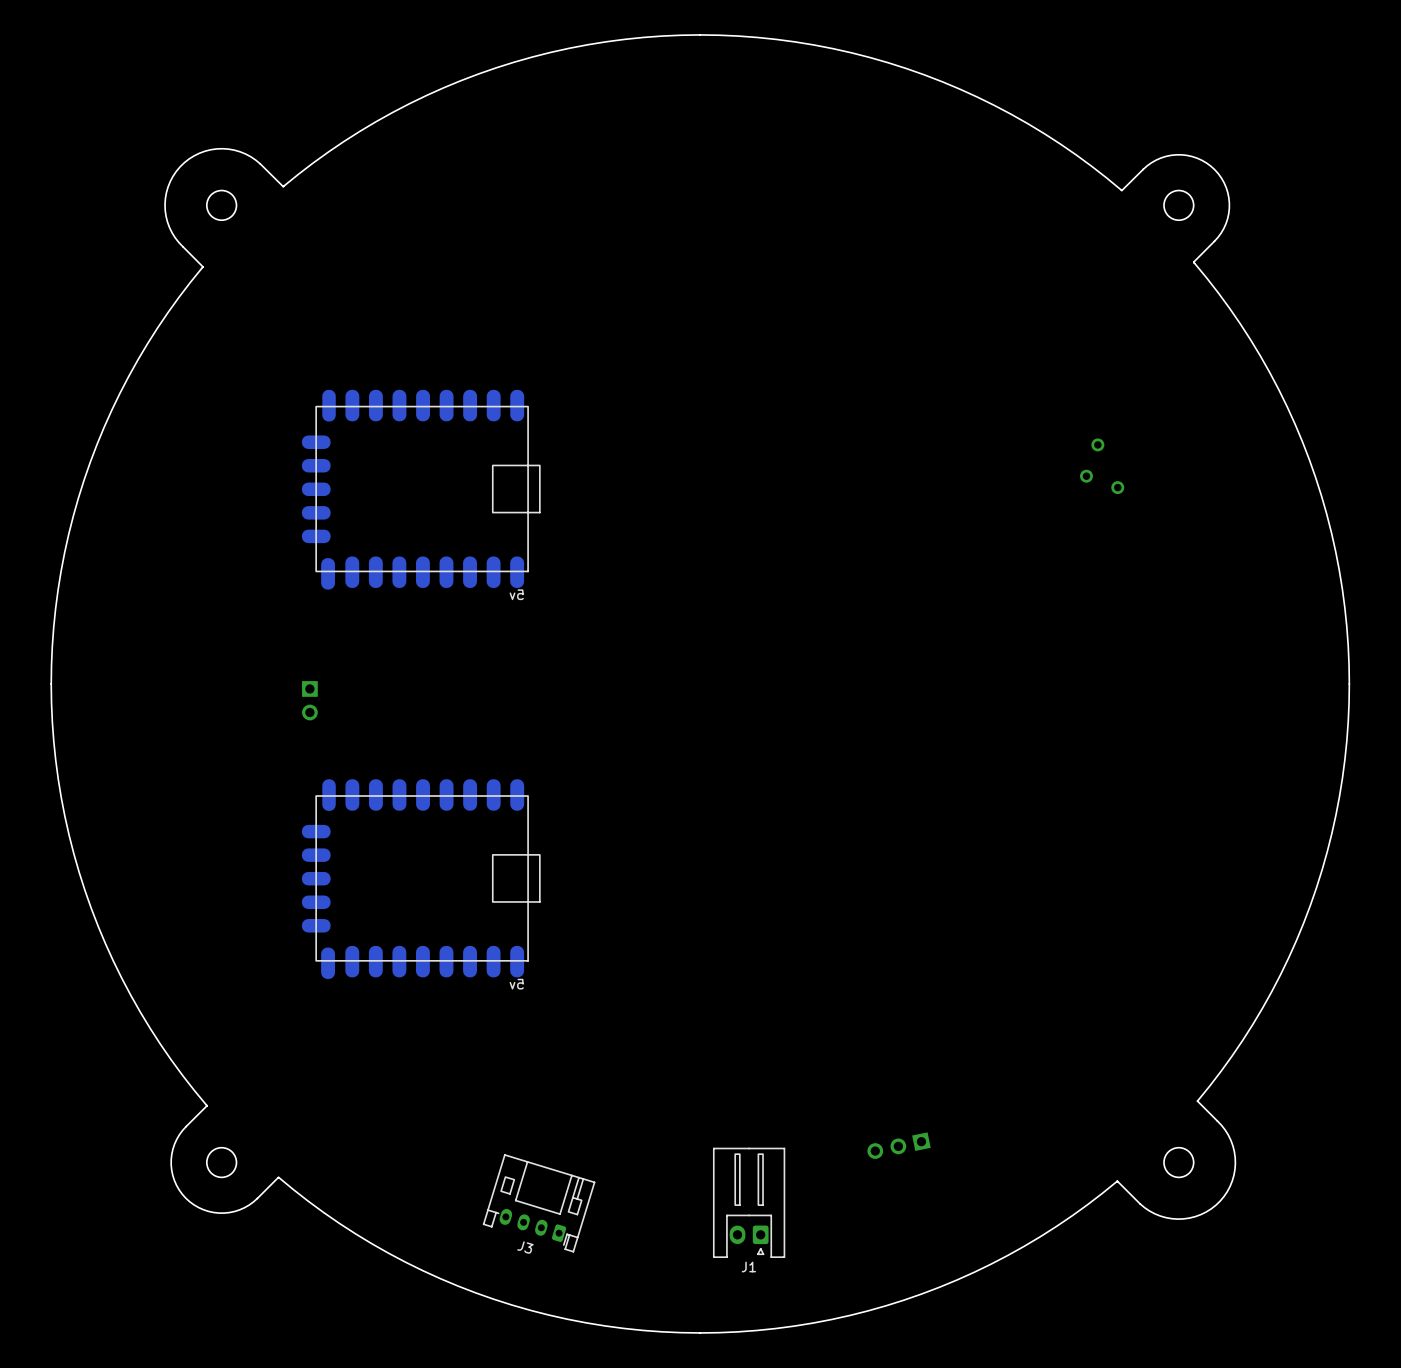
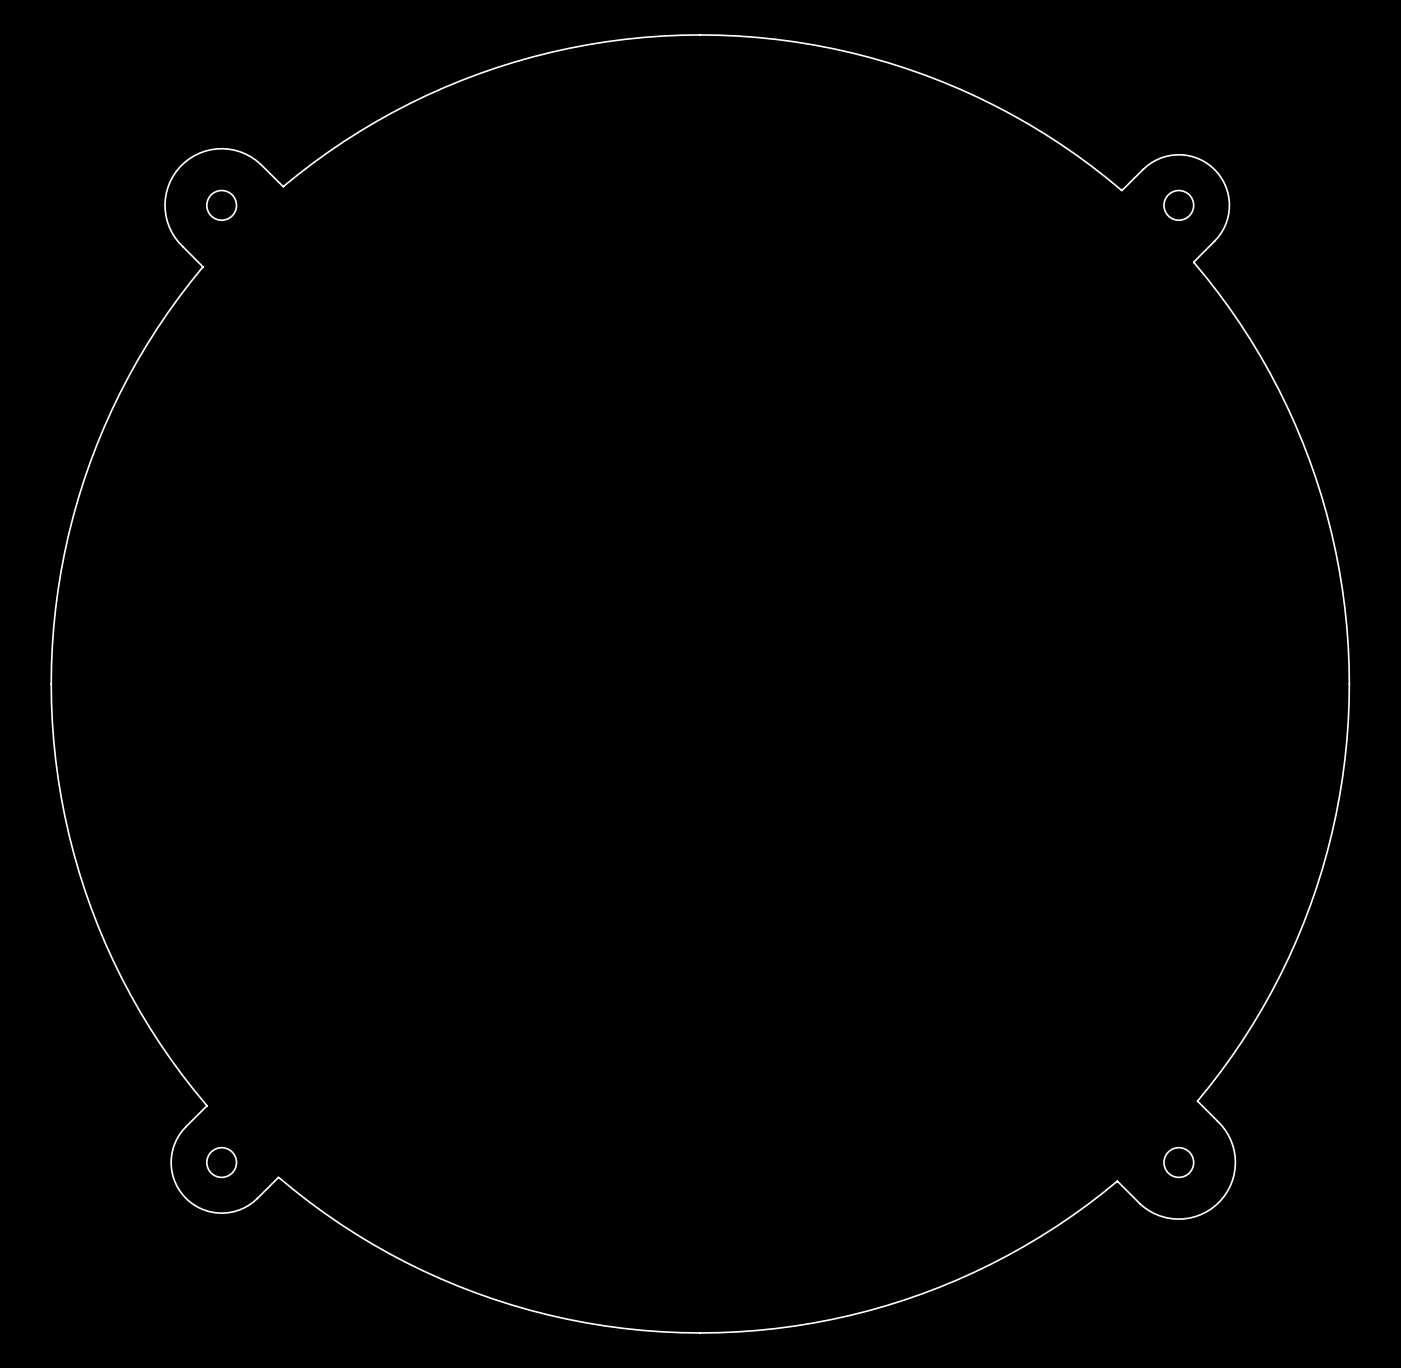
part: (1102, 466) -> none
part: (421, 489) -> none
part: (309, 700) -> none
part: (421, 879) -> none
part: (899, 1145) -> none
J1: (749, 1202) -> none
J3: (539, 1203) -> none

